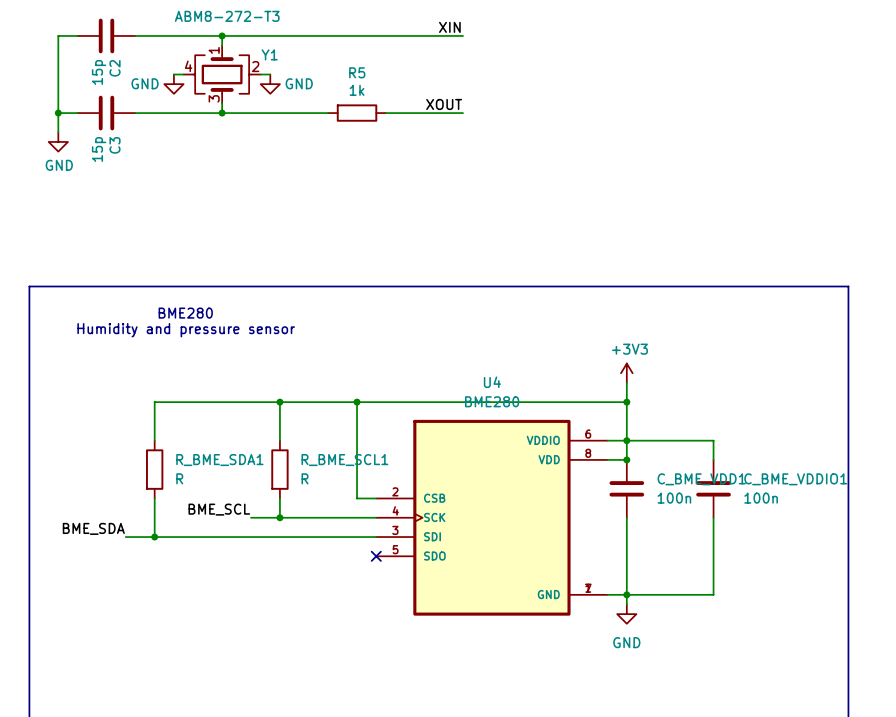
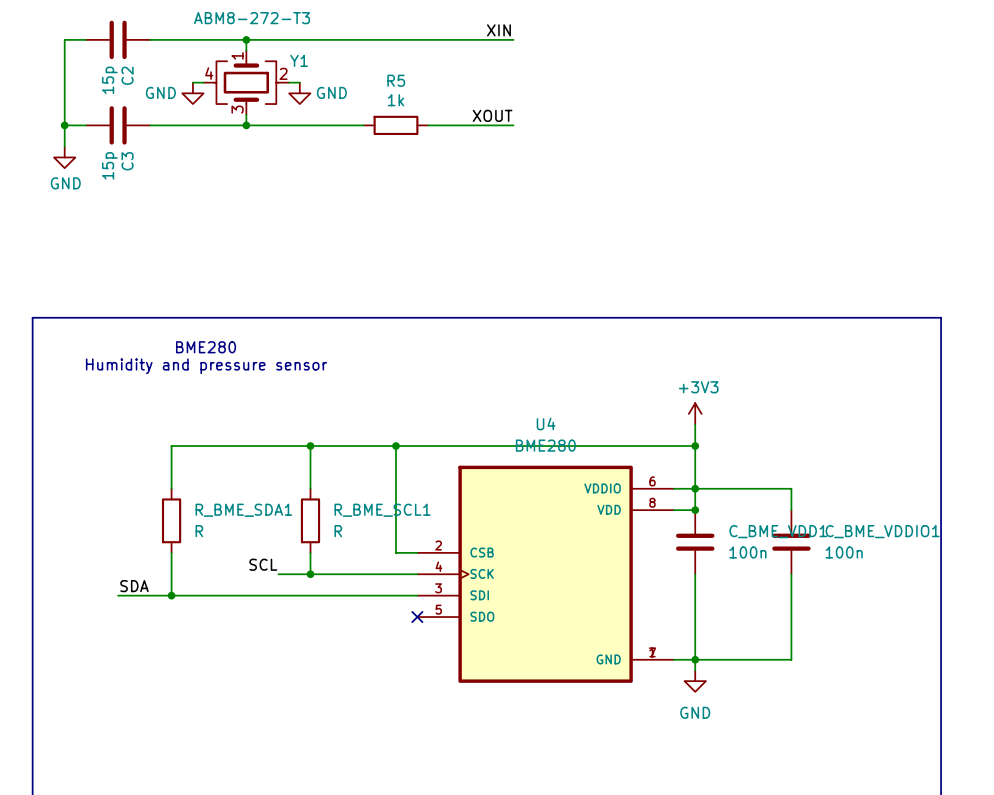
label: BME_SCL (219, 509) -> SCL (263, 564)
label: BME_SDA (93, 528) -> none
label: none -> SDA (134, 586)
wire: none -> (118, 595) (139, 595)

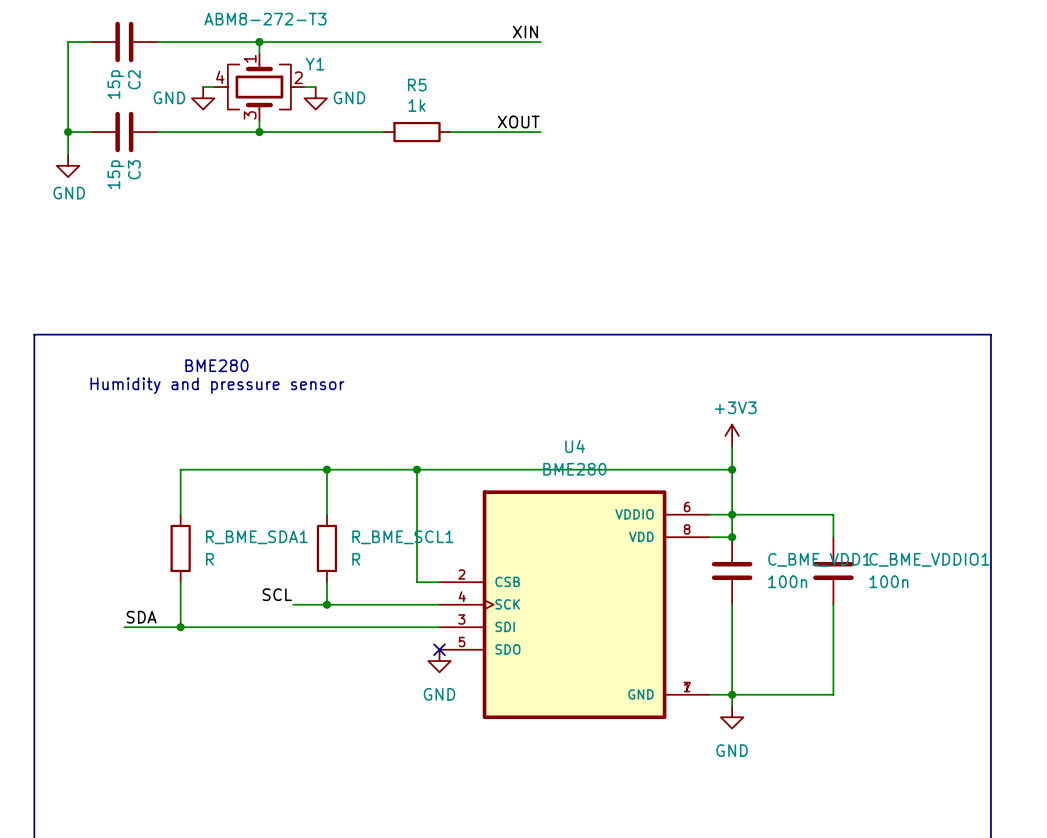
power symbol: none -> GND (439, 661)

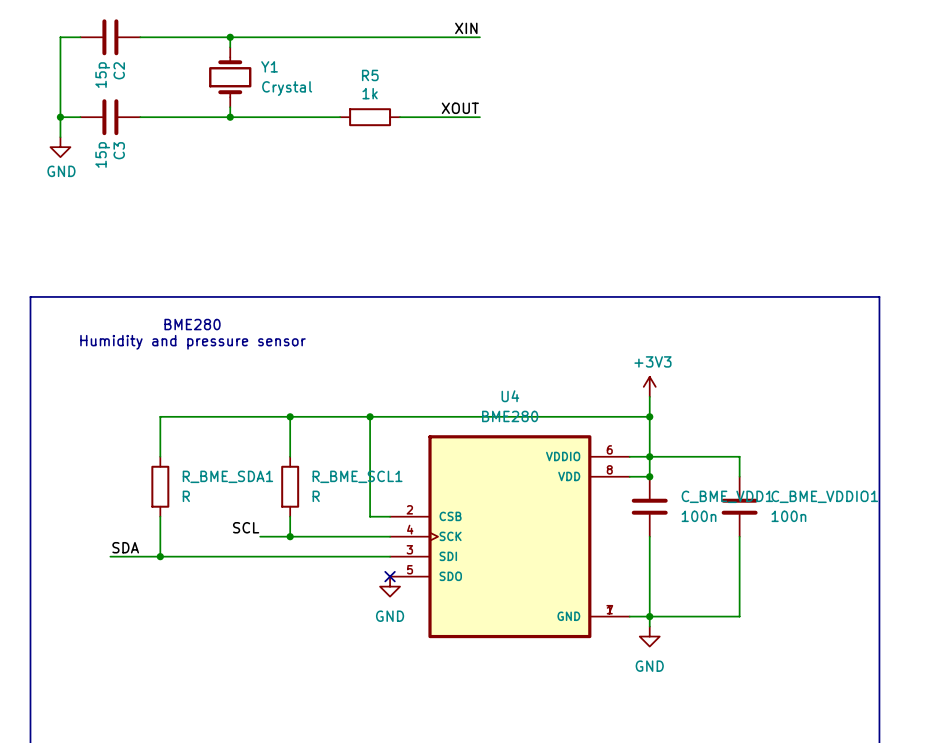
Y1 value: ABM8-272-T3 (265, 19) -> Crystal (287, 88)
Y1 symbol: [214, 53, 305, 121] -> [209, 47, 252, 108]
wire: (203, 87) (214, 87) -> none
wire: (304, 87) (315, 87) -> none
power symbol: GND (203, 98) -> none
power symbol: GND (315, 98) -> none

